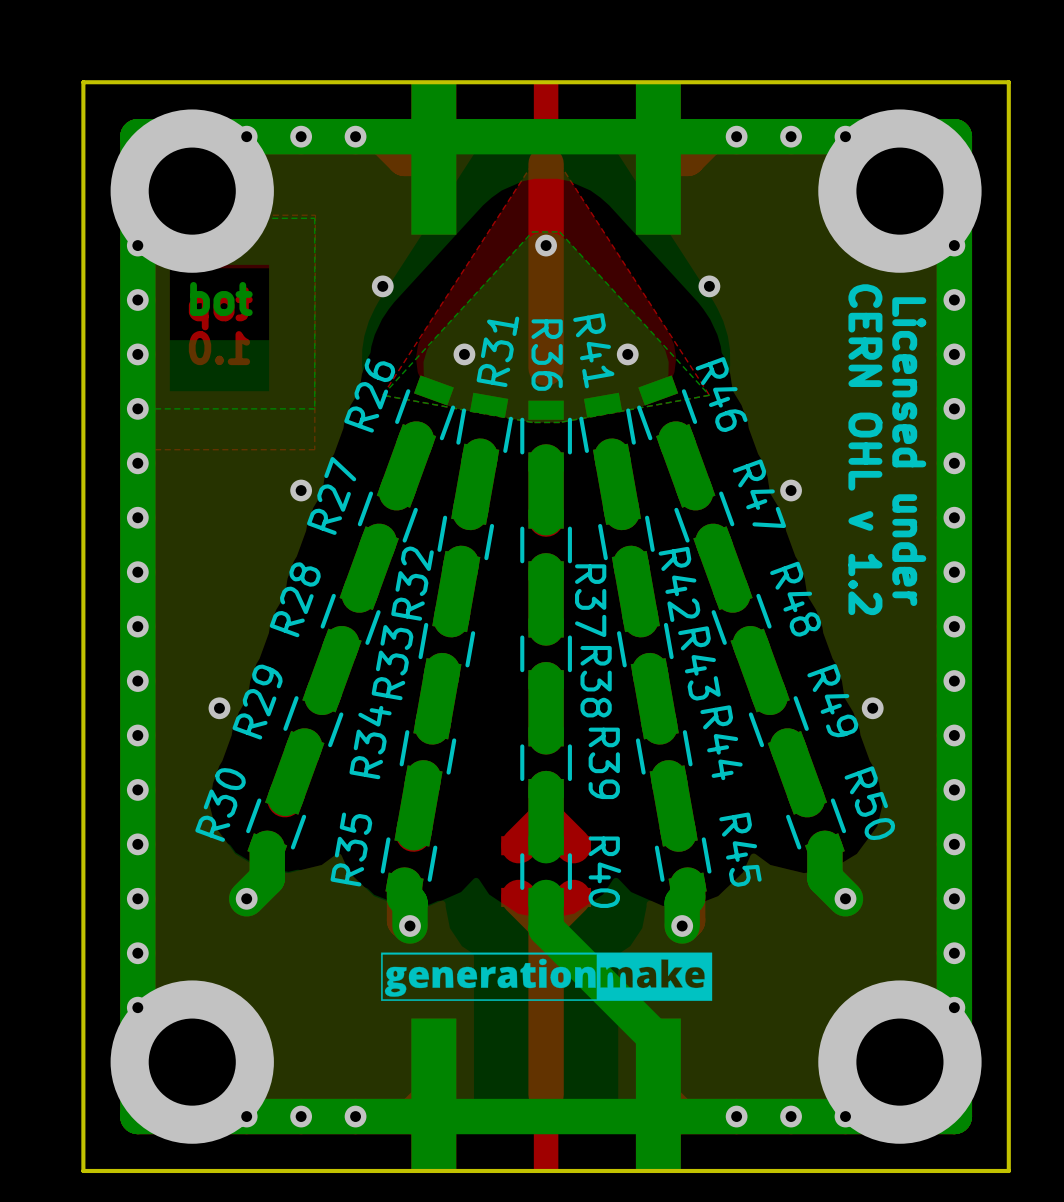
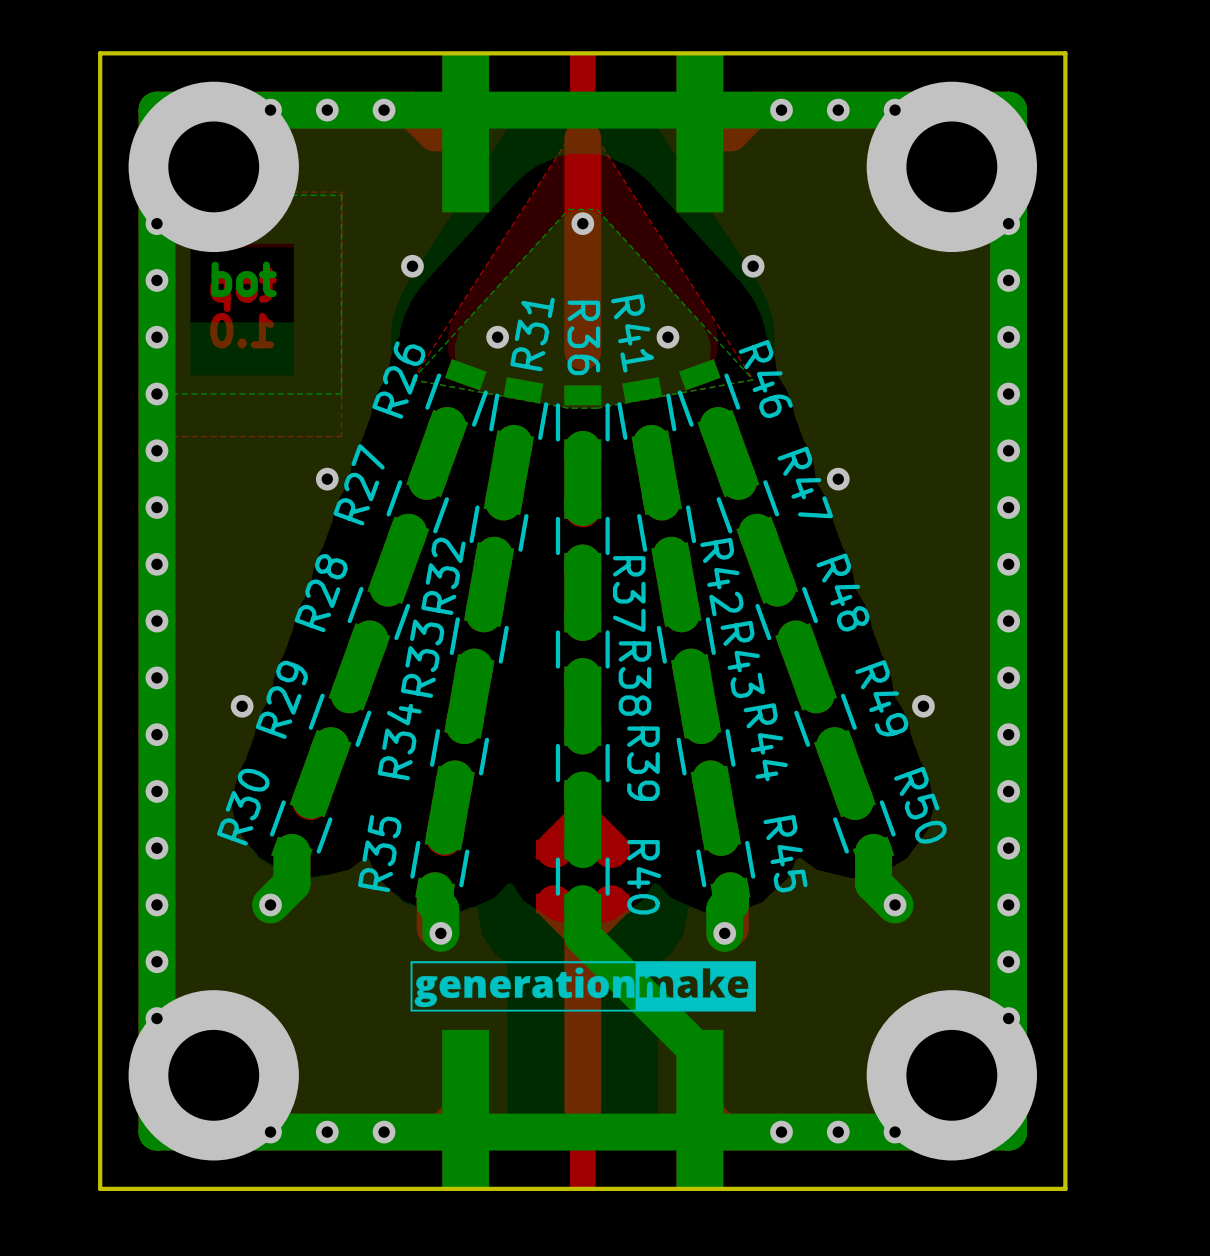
text: CERN OHL v 1.2 (865, 449) -> none
text: Licensed under (909, 451) -> none

